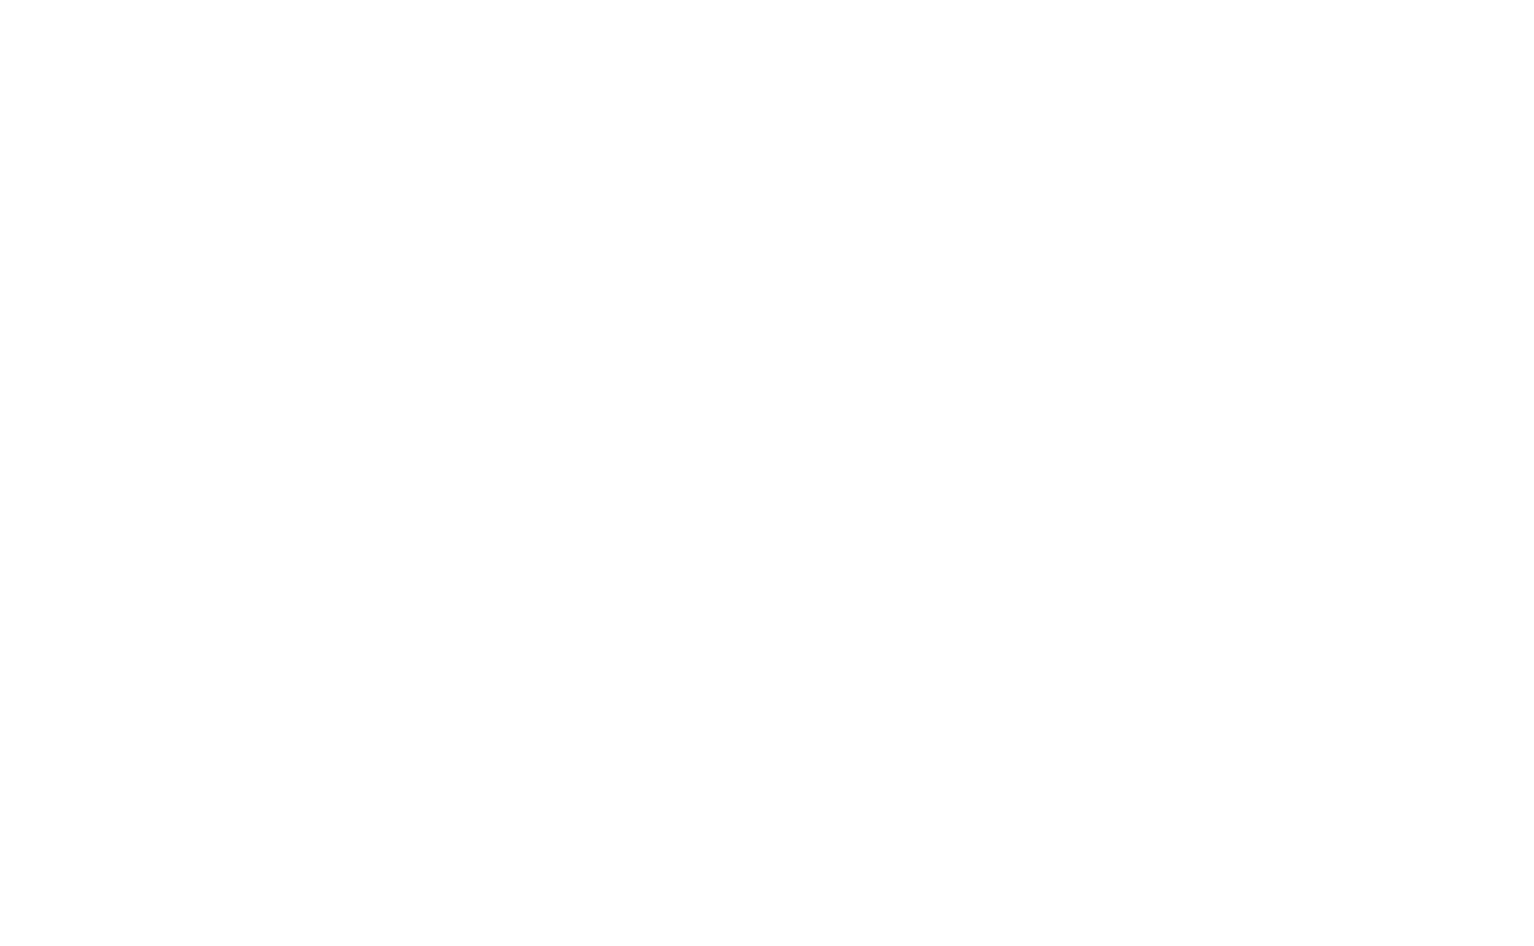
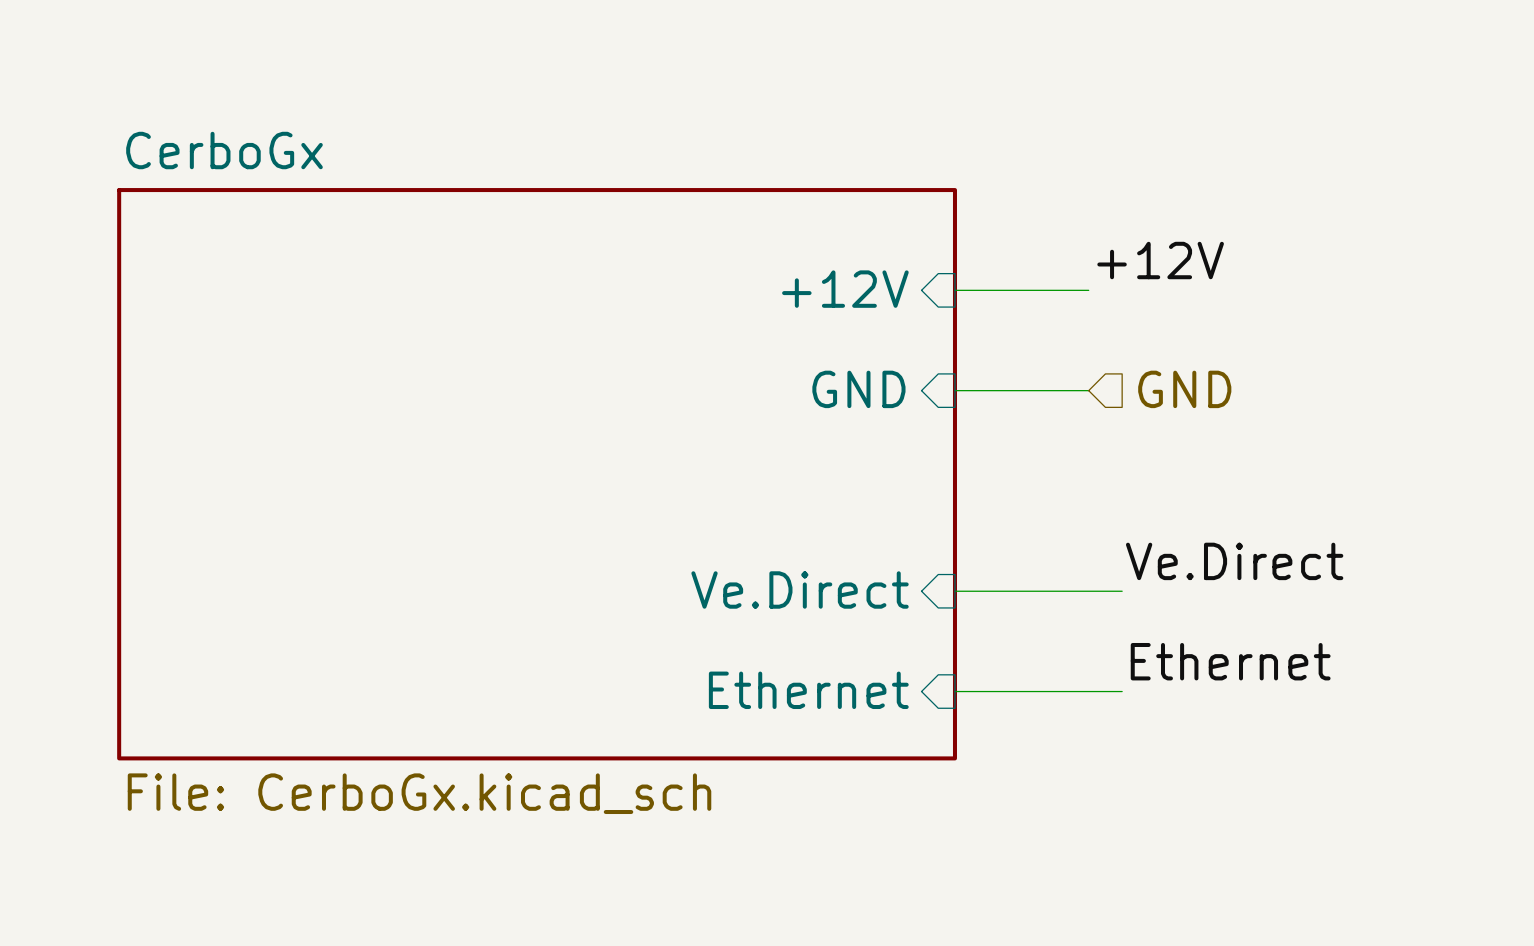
label: none -> +12V (1160, 260)
sheet pin: none -> +12V (845, 289)
wire: none -> (954, 290) (1088, 290)
sheet pin: none -> GND (858, 389)
hierarchical label: none -> GND (1184, 389)
wire: none -> (954, 390) (1088, 390)
sheet CerboGx: none -> File: CerboGx.kicad_sch (537, 474)
label: none -> Ve.Direct (1234, 561)
sheet pin: none -> Ve.Direct (800, 589)
wire: none -> (954, 591) (1122, 591)
label: none -> Ethernet (1230, 661)
sheet pin: none -> Ethernet (808, 690)
wire: none -> (954, 691) (1122, 691)

